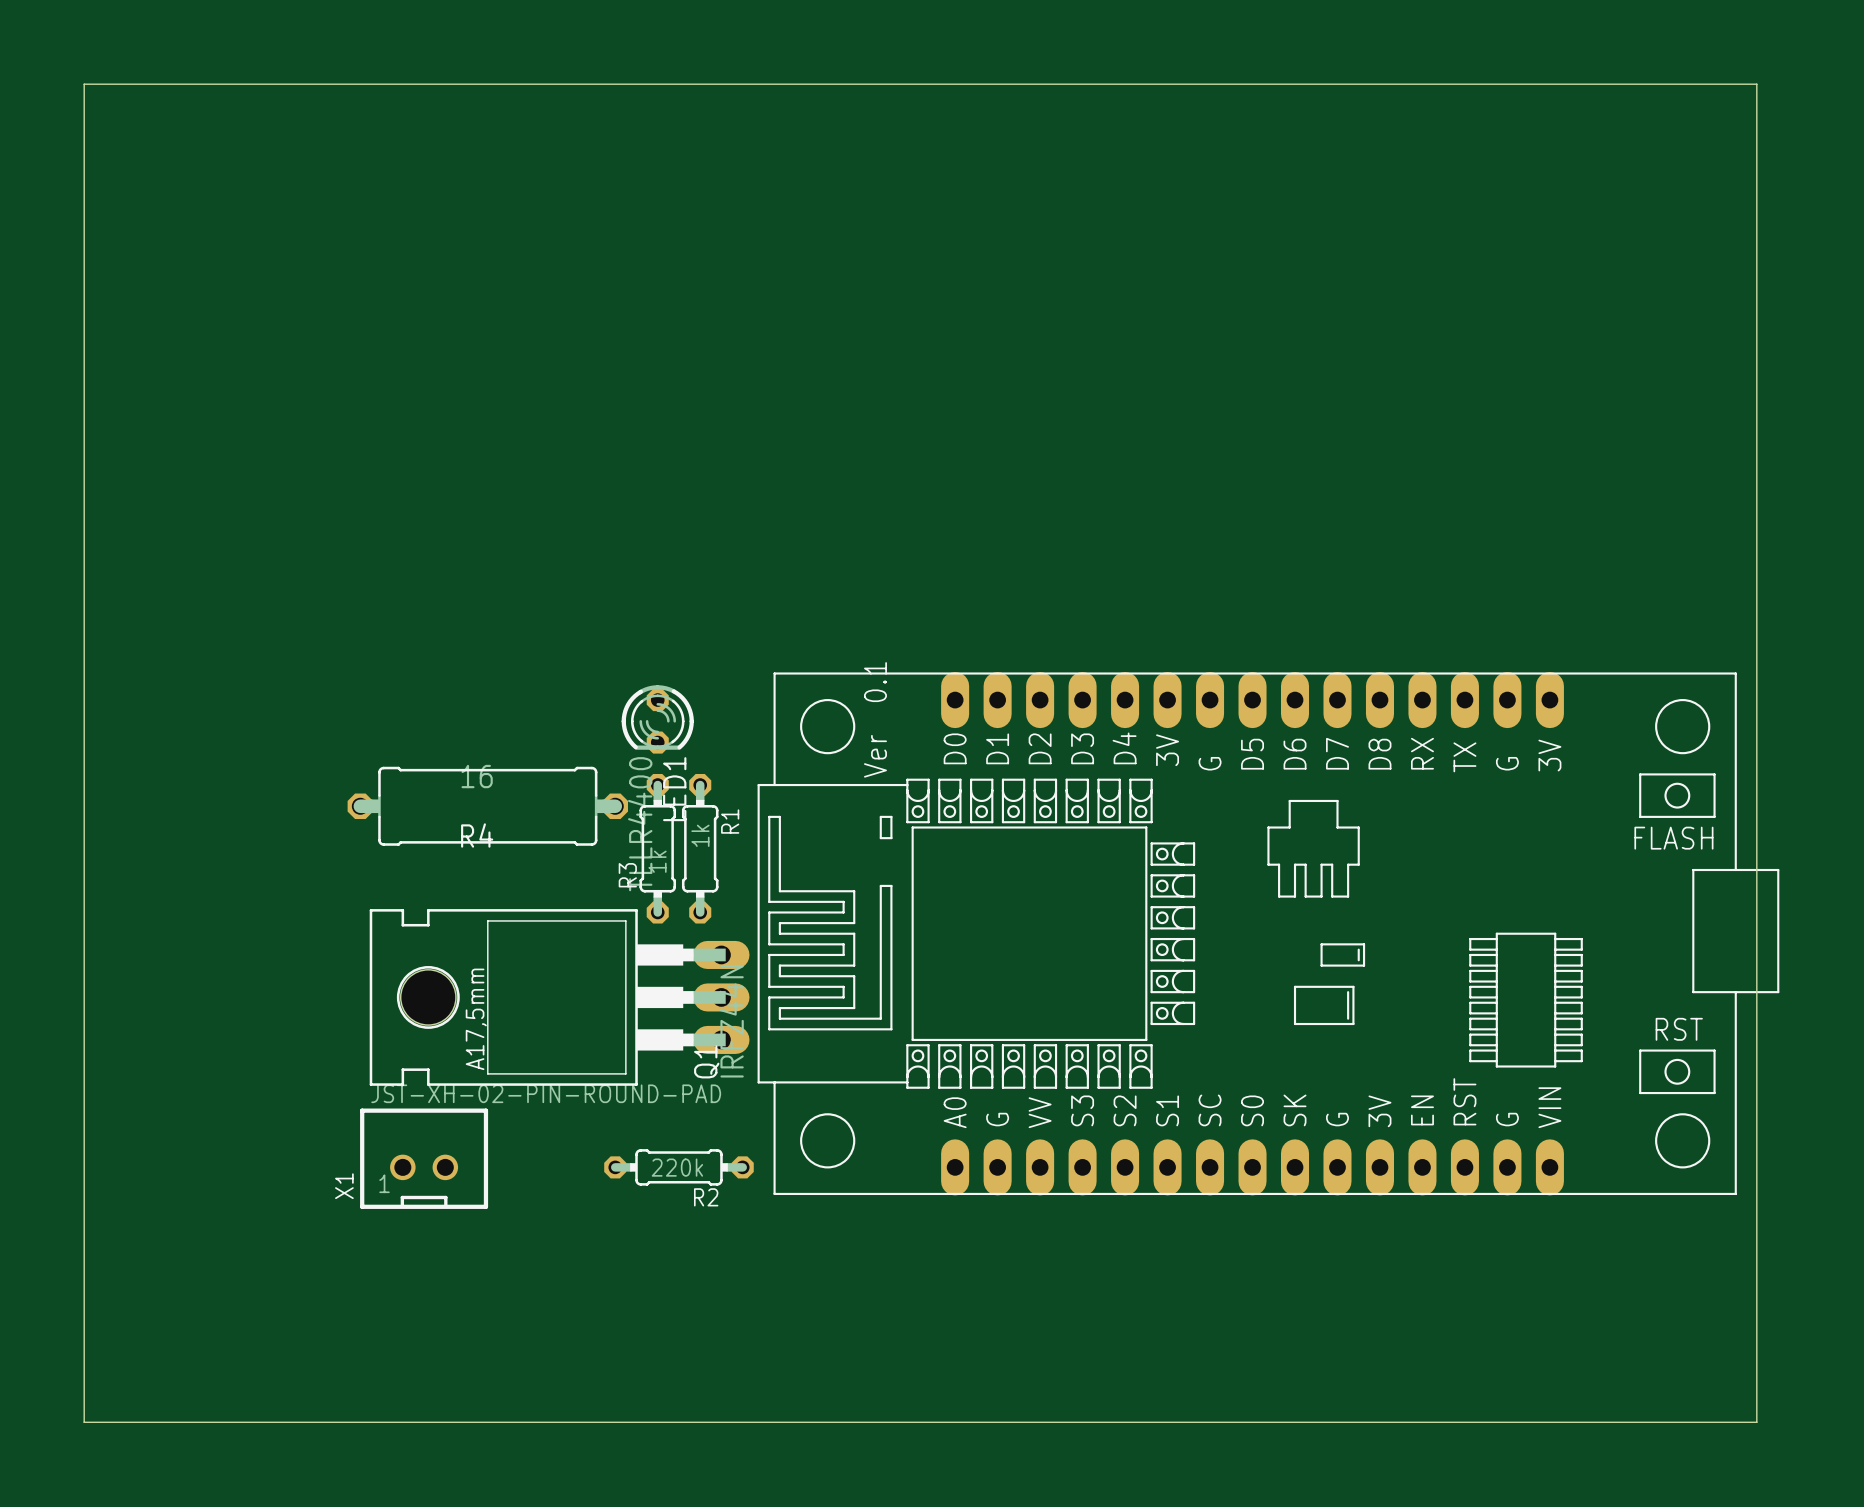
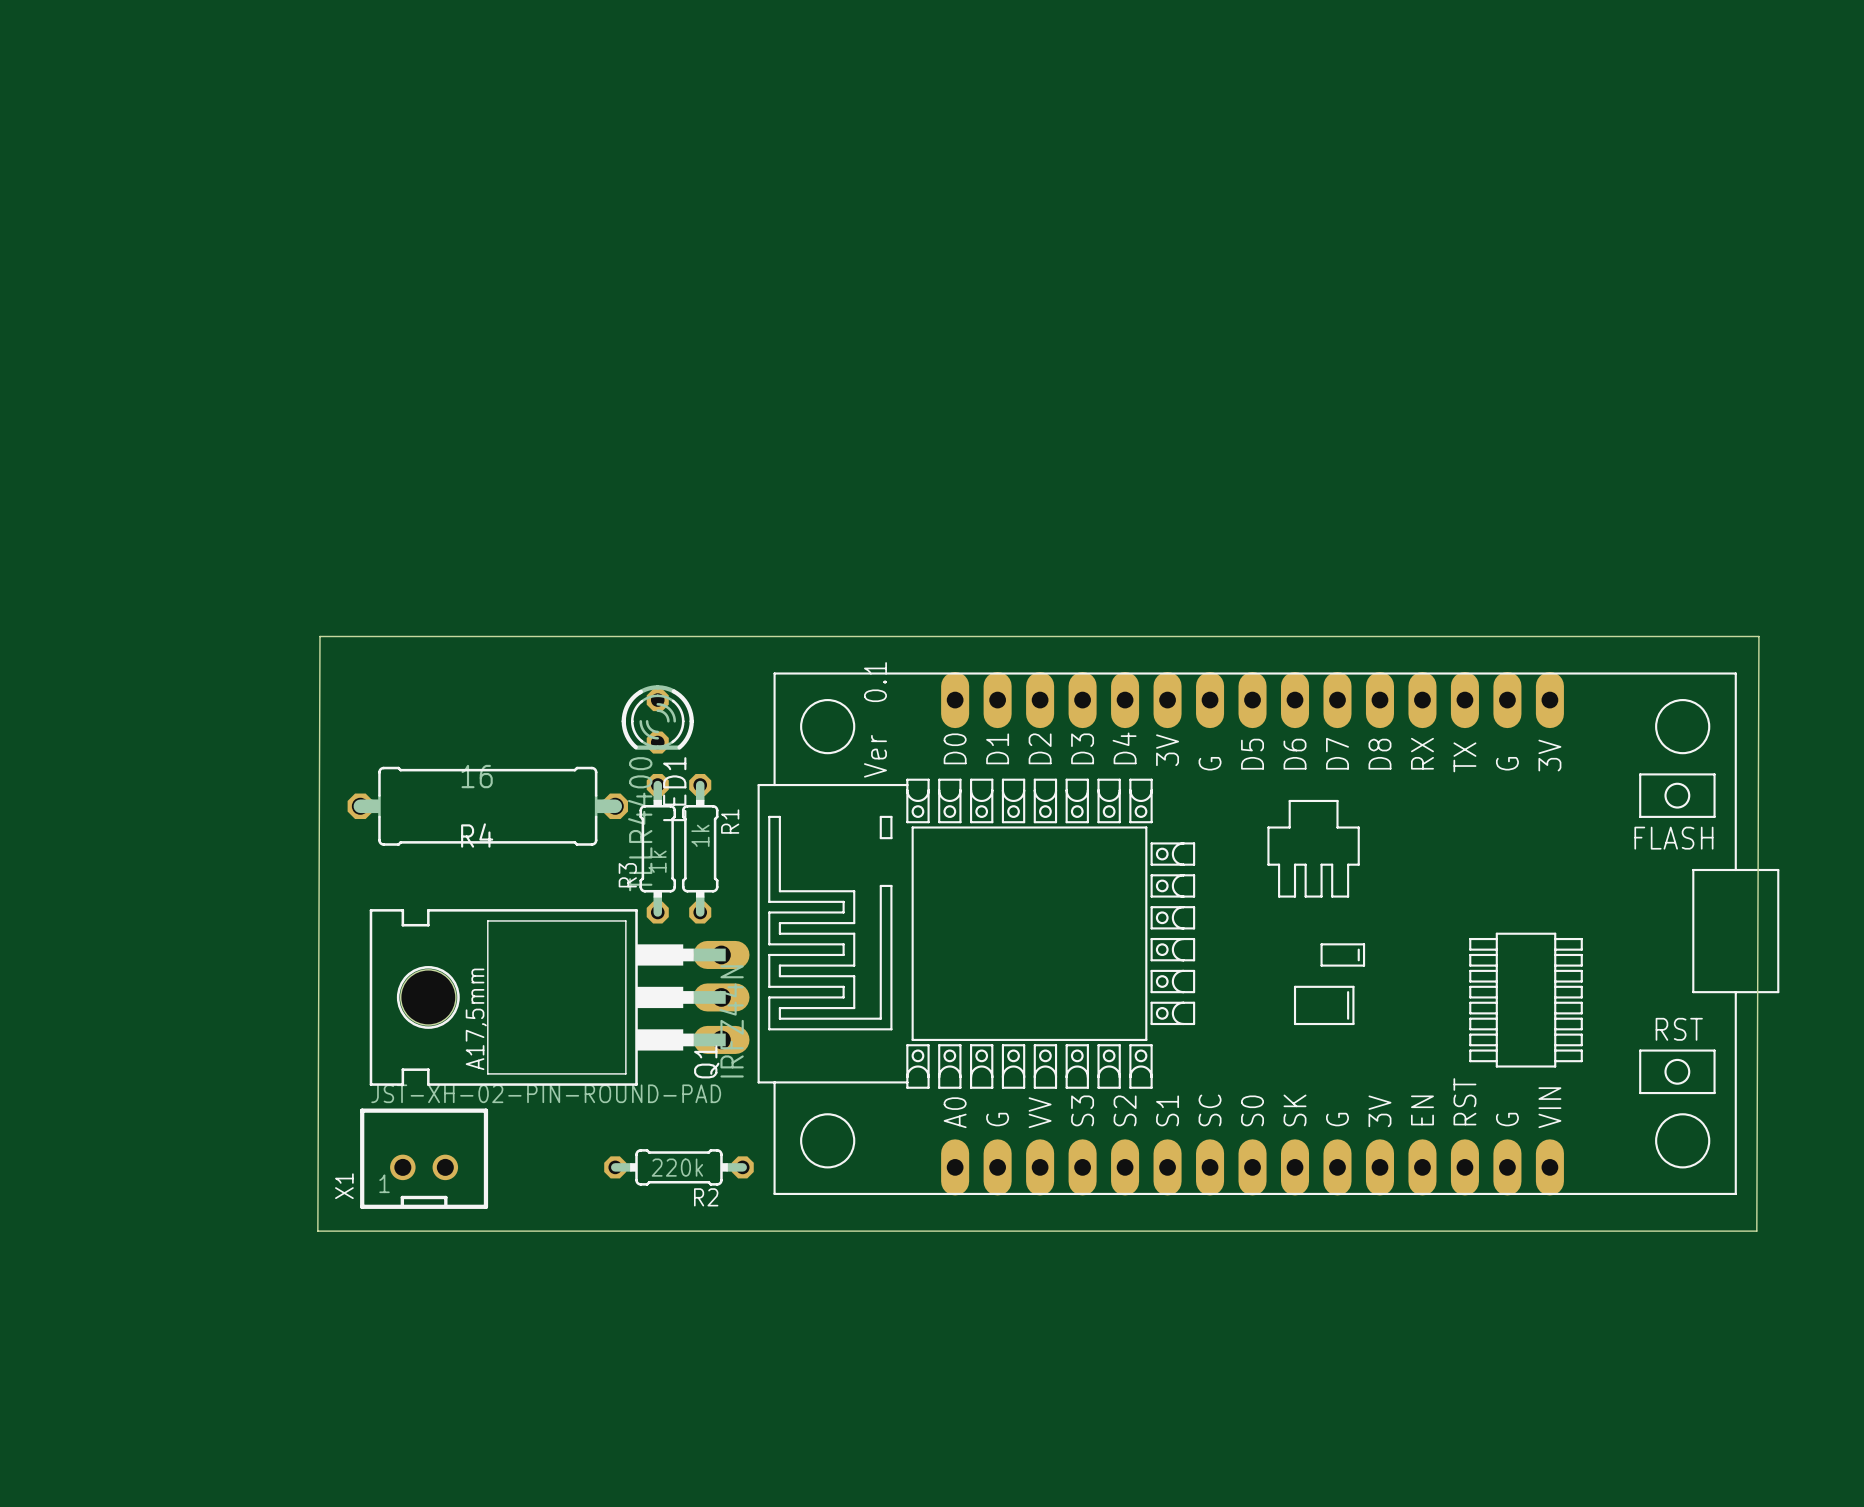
board edge: (84, 84) (1756, 84) (1756, 1422) (84, 1422) (84, 84) -> none
board edge: none -> (319, 636) (1758, 636) (1756, 1231) (317, 1231) (319, 636)

